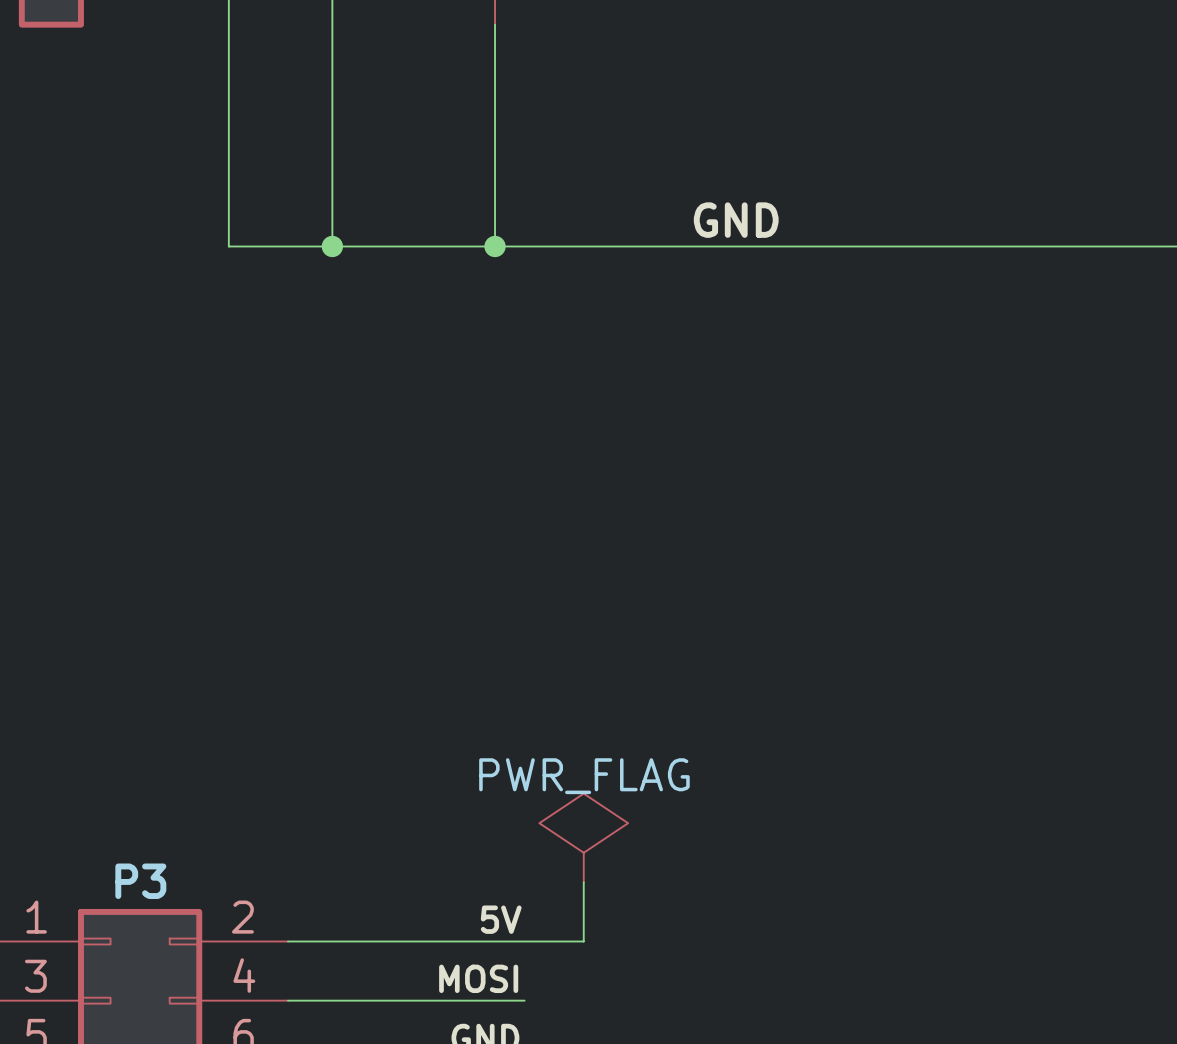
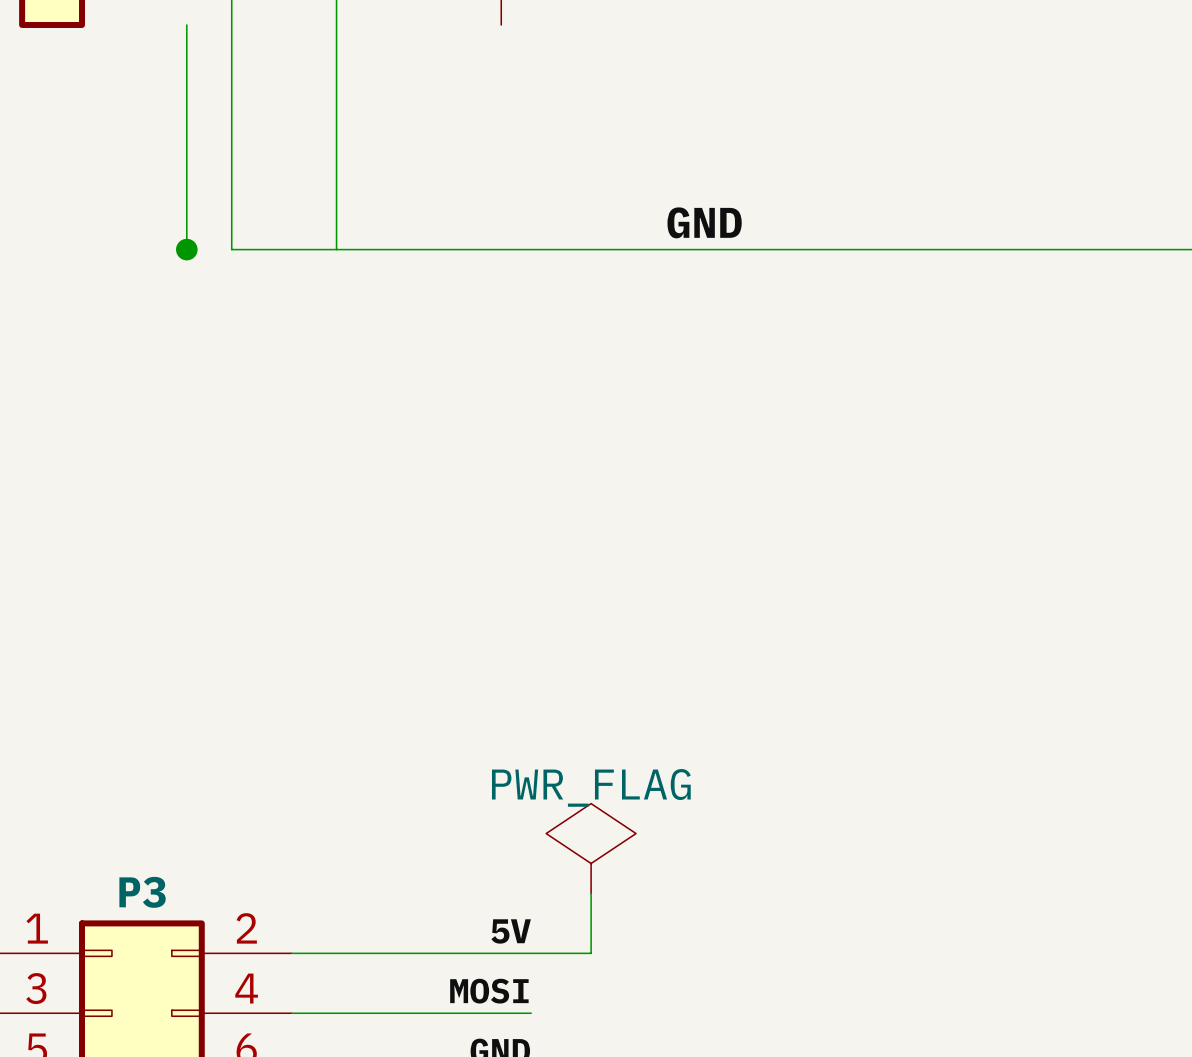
wire: (495, 24) (495, 246) -> (186, 24) (186, 249)
label position: GND (736, 220) -> GND (704, 222)
junction: none -> (186, 249)
junction: (332, 246) -> none
junction: (495, 246) -> none

